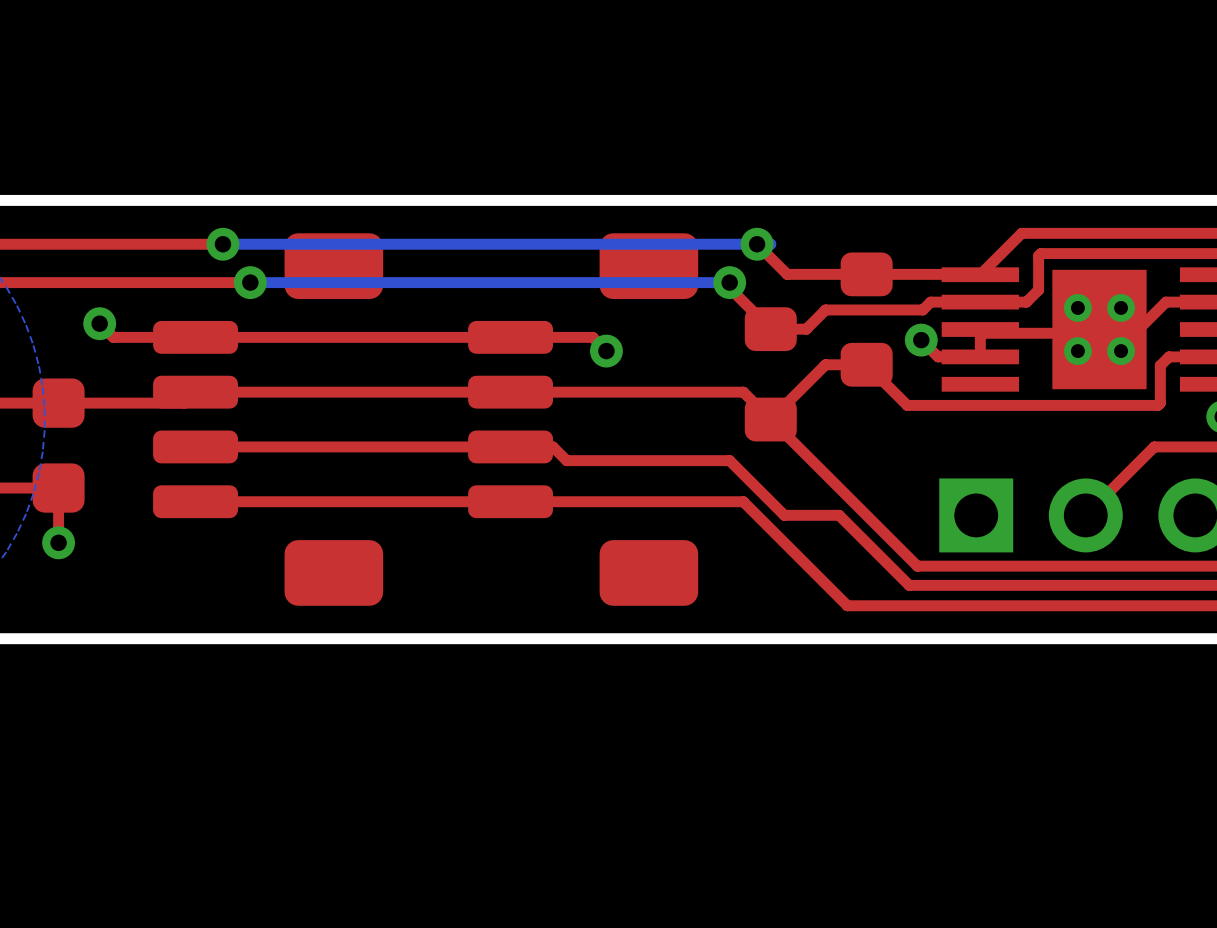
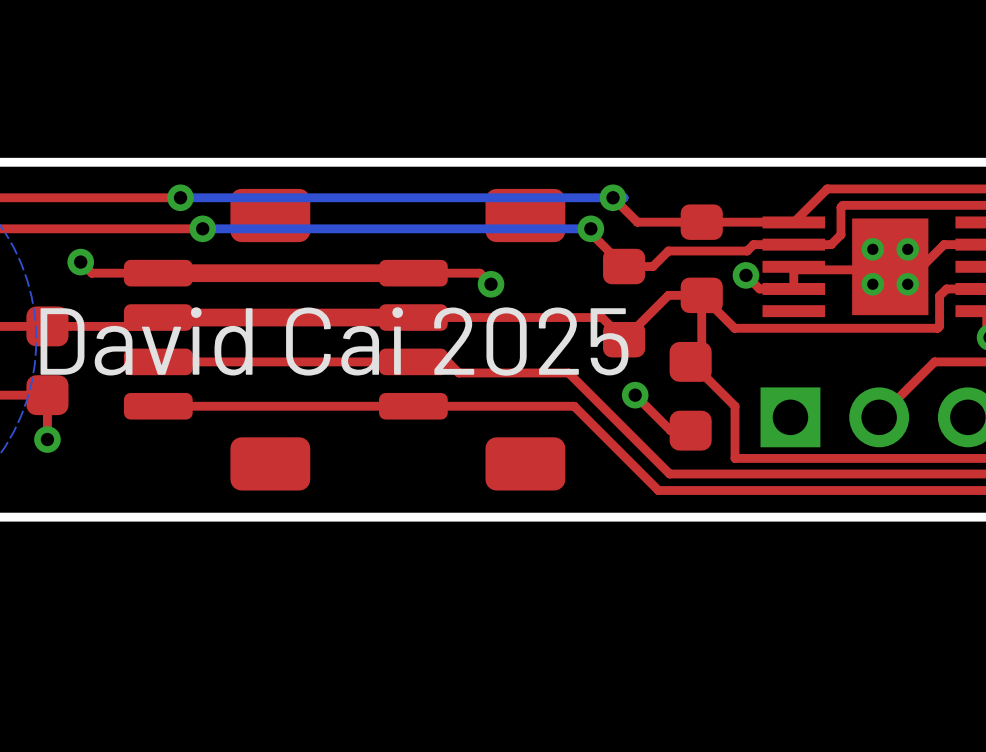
top track width: thin (510, 337) (195, 337) -> thick (413, 273) (158, 273)
top track width: thin (510, 392) (195, 392) -> thick (413, 317) (158, 317)
top track: (770, 419) (917, 566) -> (701, 295) (701, 350) (690, 361) (735, 406) (735, 458) (742, 458)
text: none -> David Cai 2025 (334, 341)
top track: (702, 460) (729, 460) (784, 515) (839, 515) (909, 585) -> none
top track: none -> (635, 395) (670, 430) (690, 430)
via: none -> (635, 395)
part: none -> (690, 396)
top track: none -> (574, 406) (658, 490) (686, 490)
top track: (743, 501) (709, 501) -> (601, 406) (568, 372)
top track: (827, 585) (847, 605) -> (669, 473) (736, 473)

